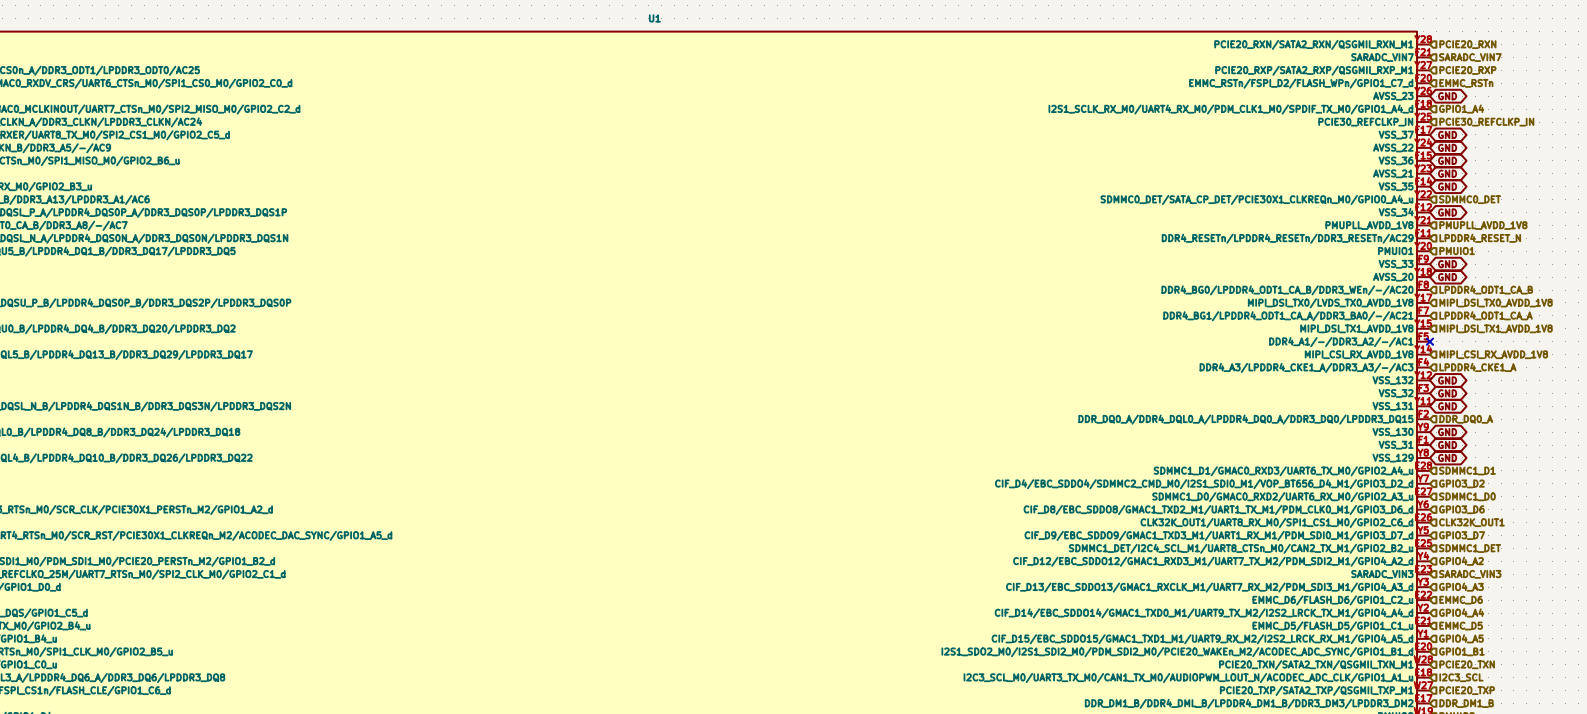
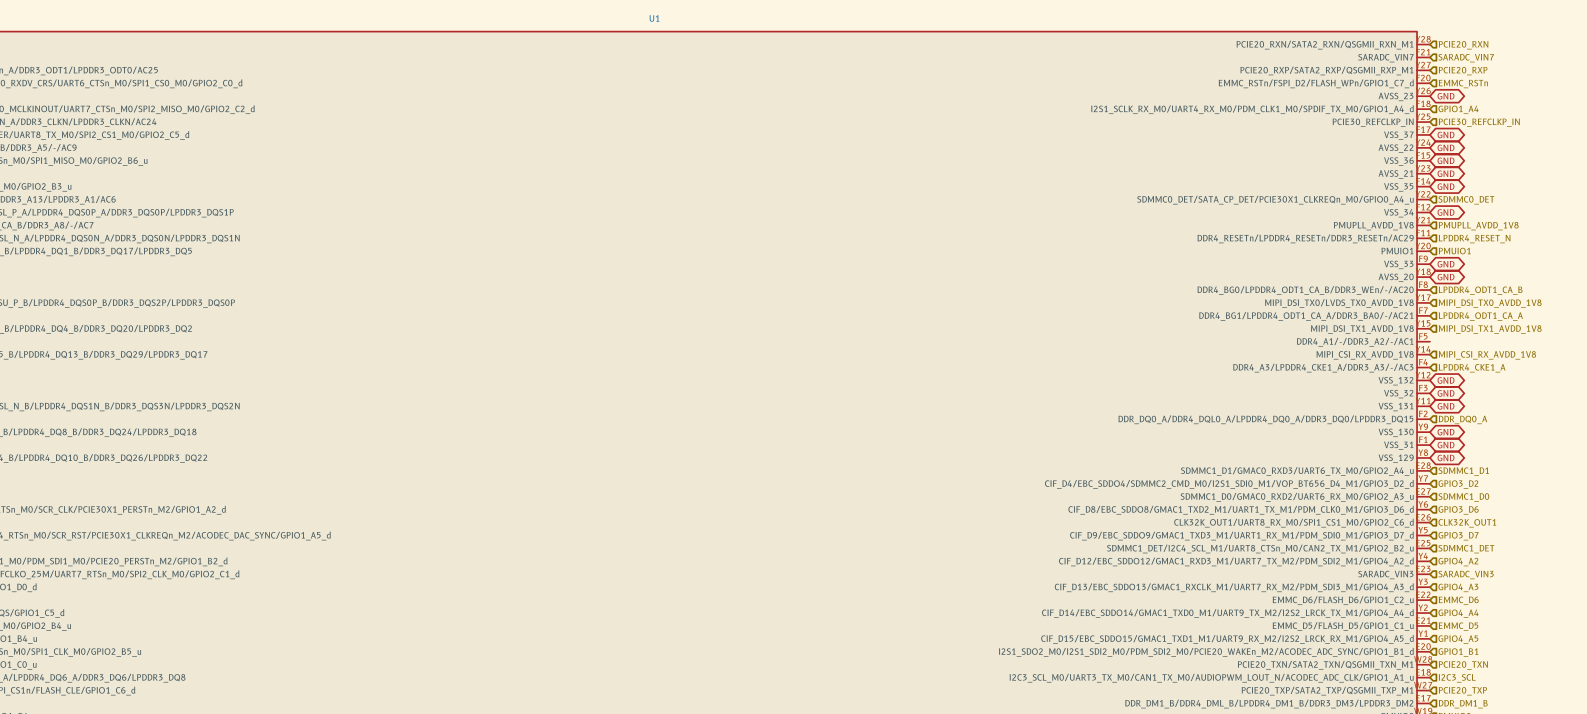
no-connect mark: (1429, 341) -> none

